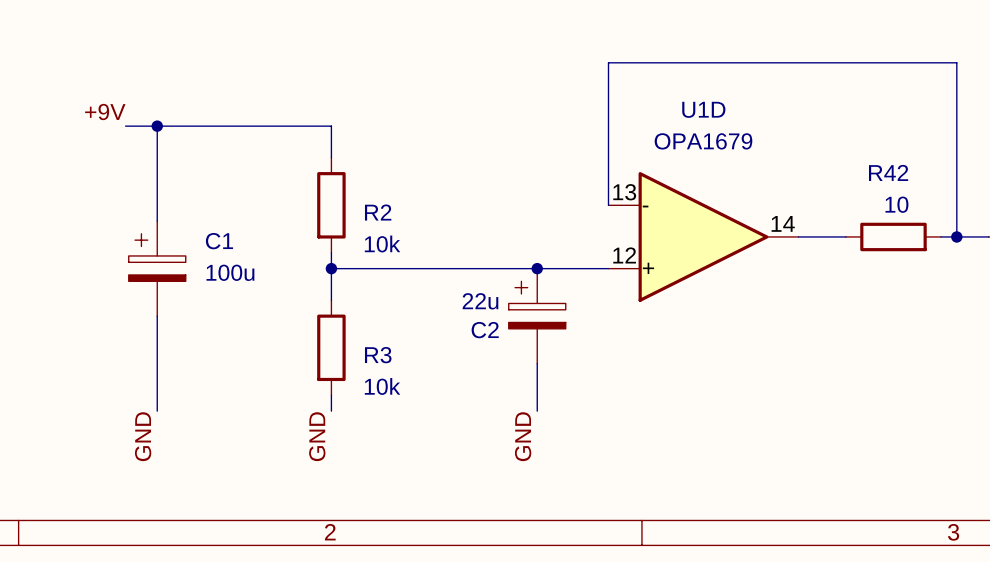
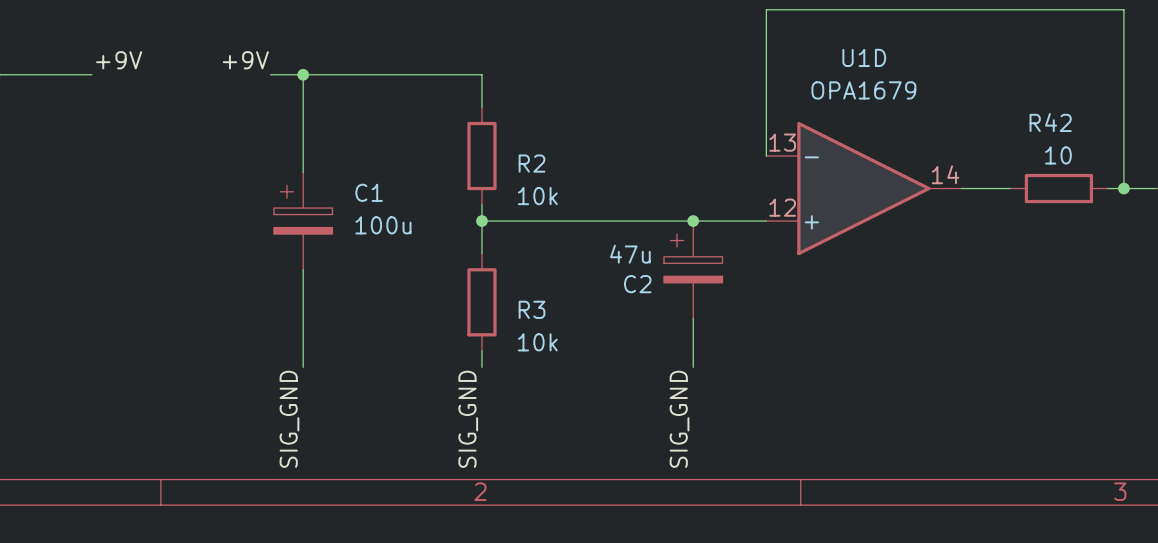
C2 value: 22u (480, 301) -> 47u (630, 254)
label: GND (143, 436) -> SIG_GND (289, 419)
label: GND (317, 436) -> SIG_GND (468, 419)
label: GND (523, 436) -> SIG_GND (679, 419)

